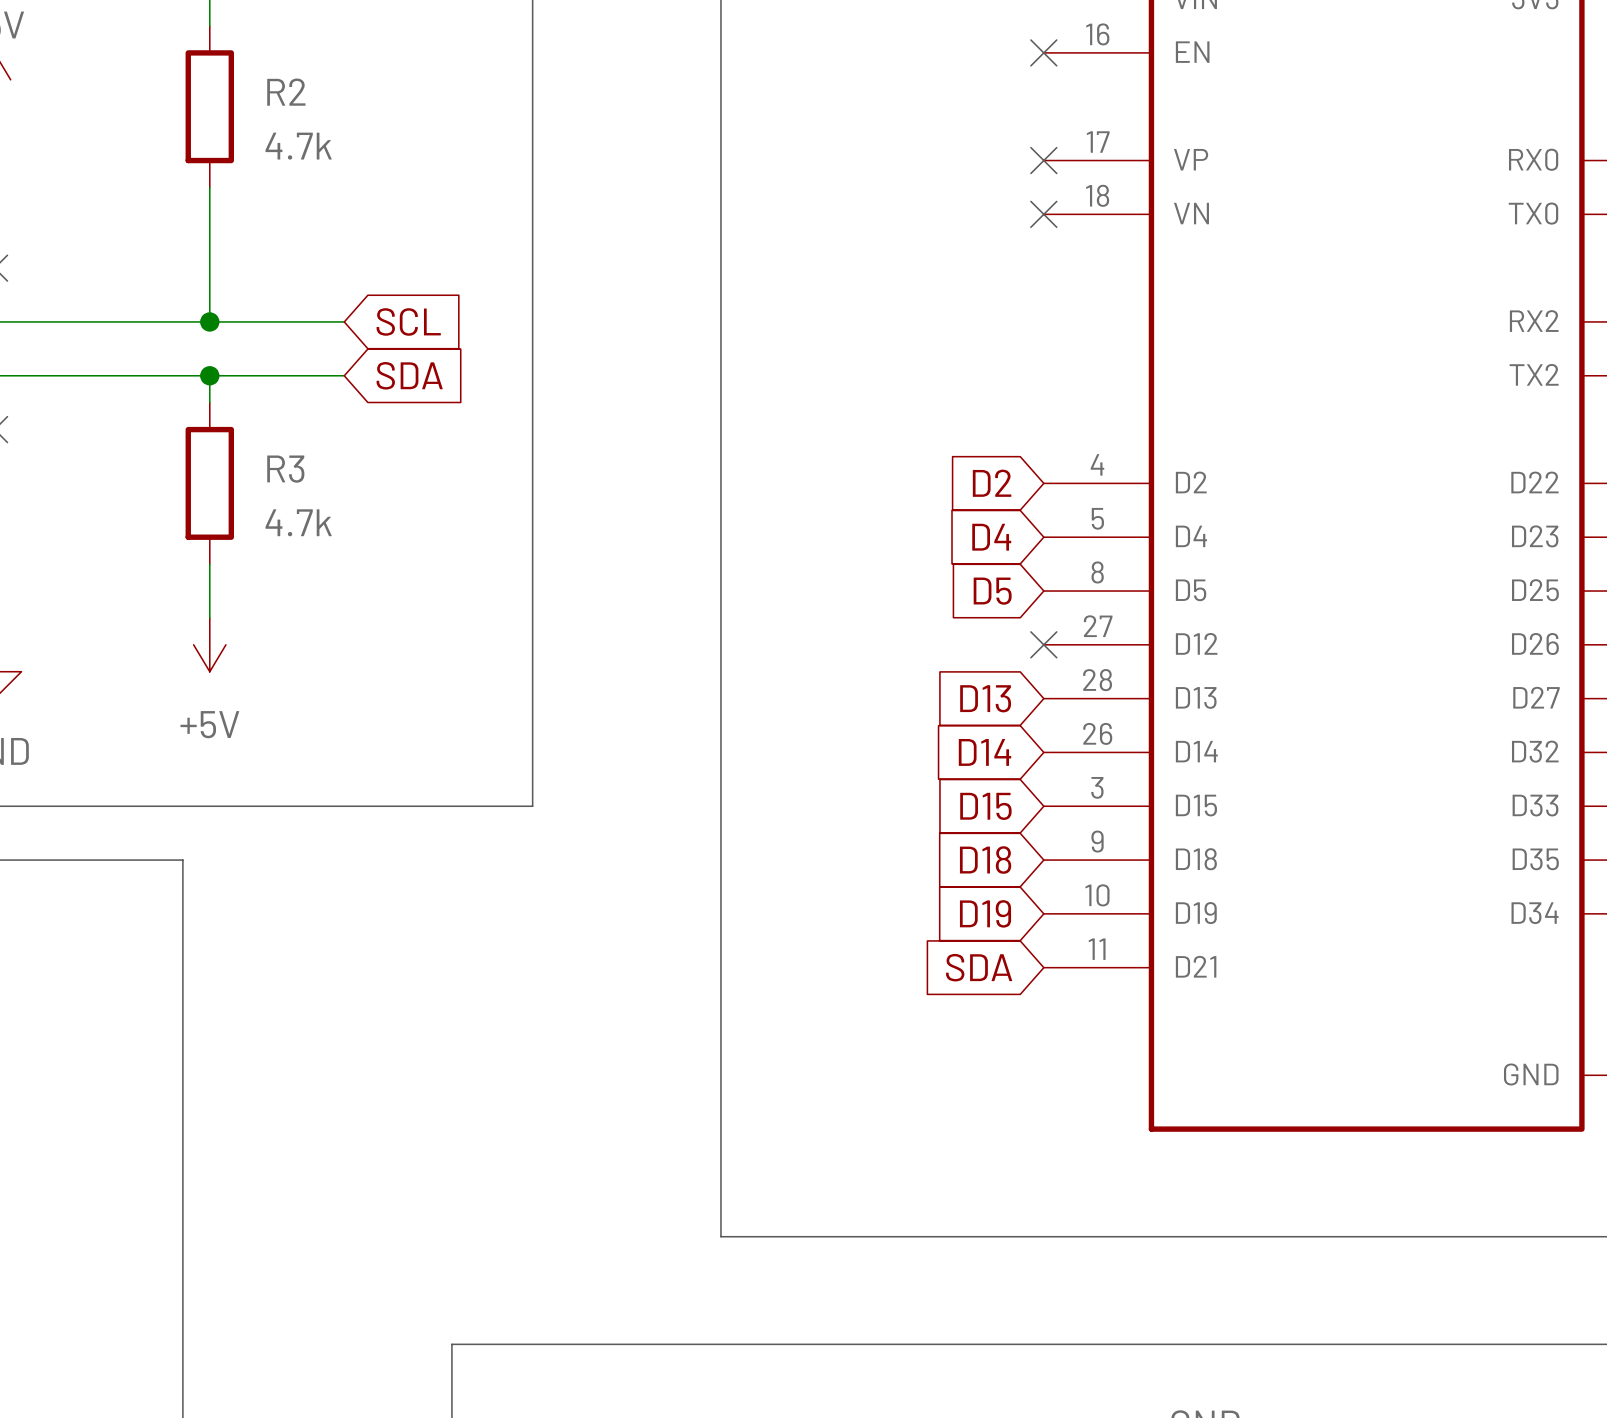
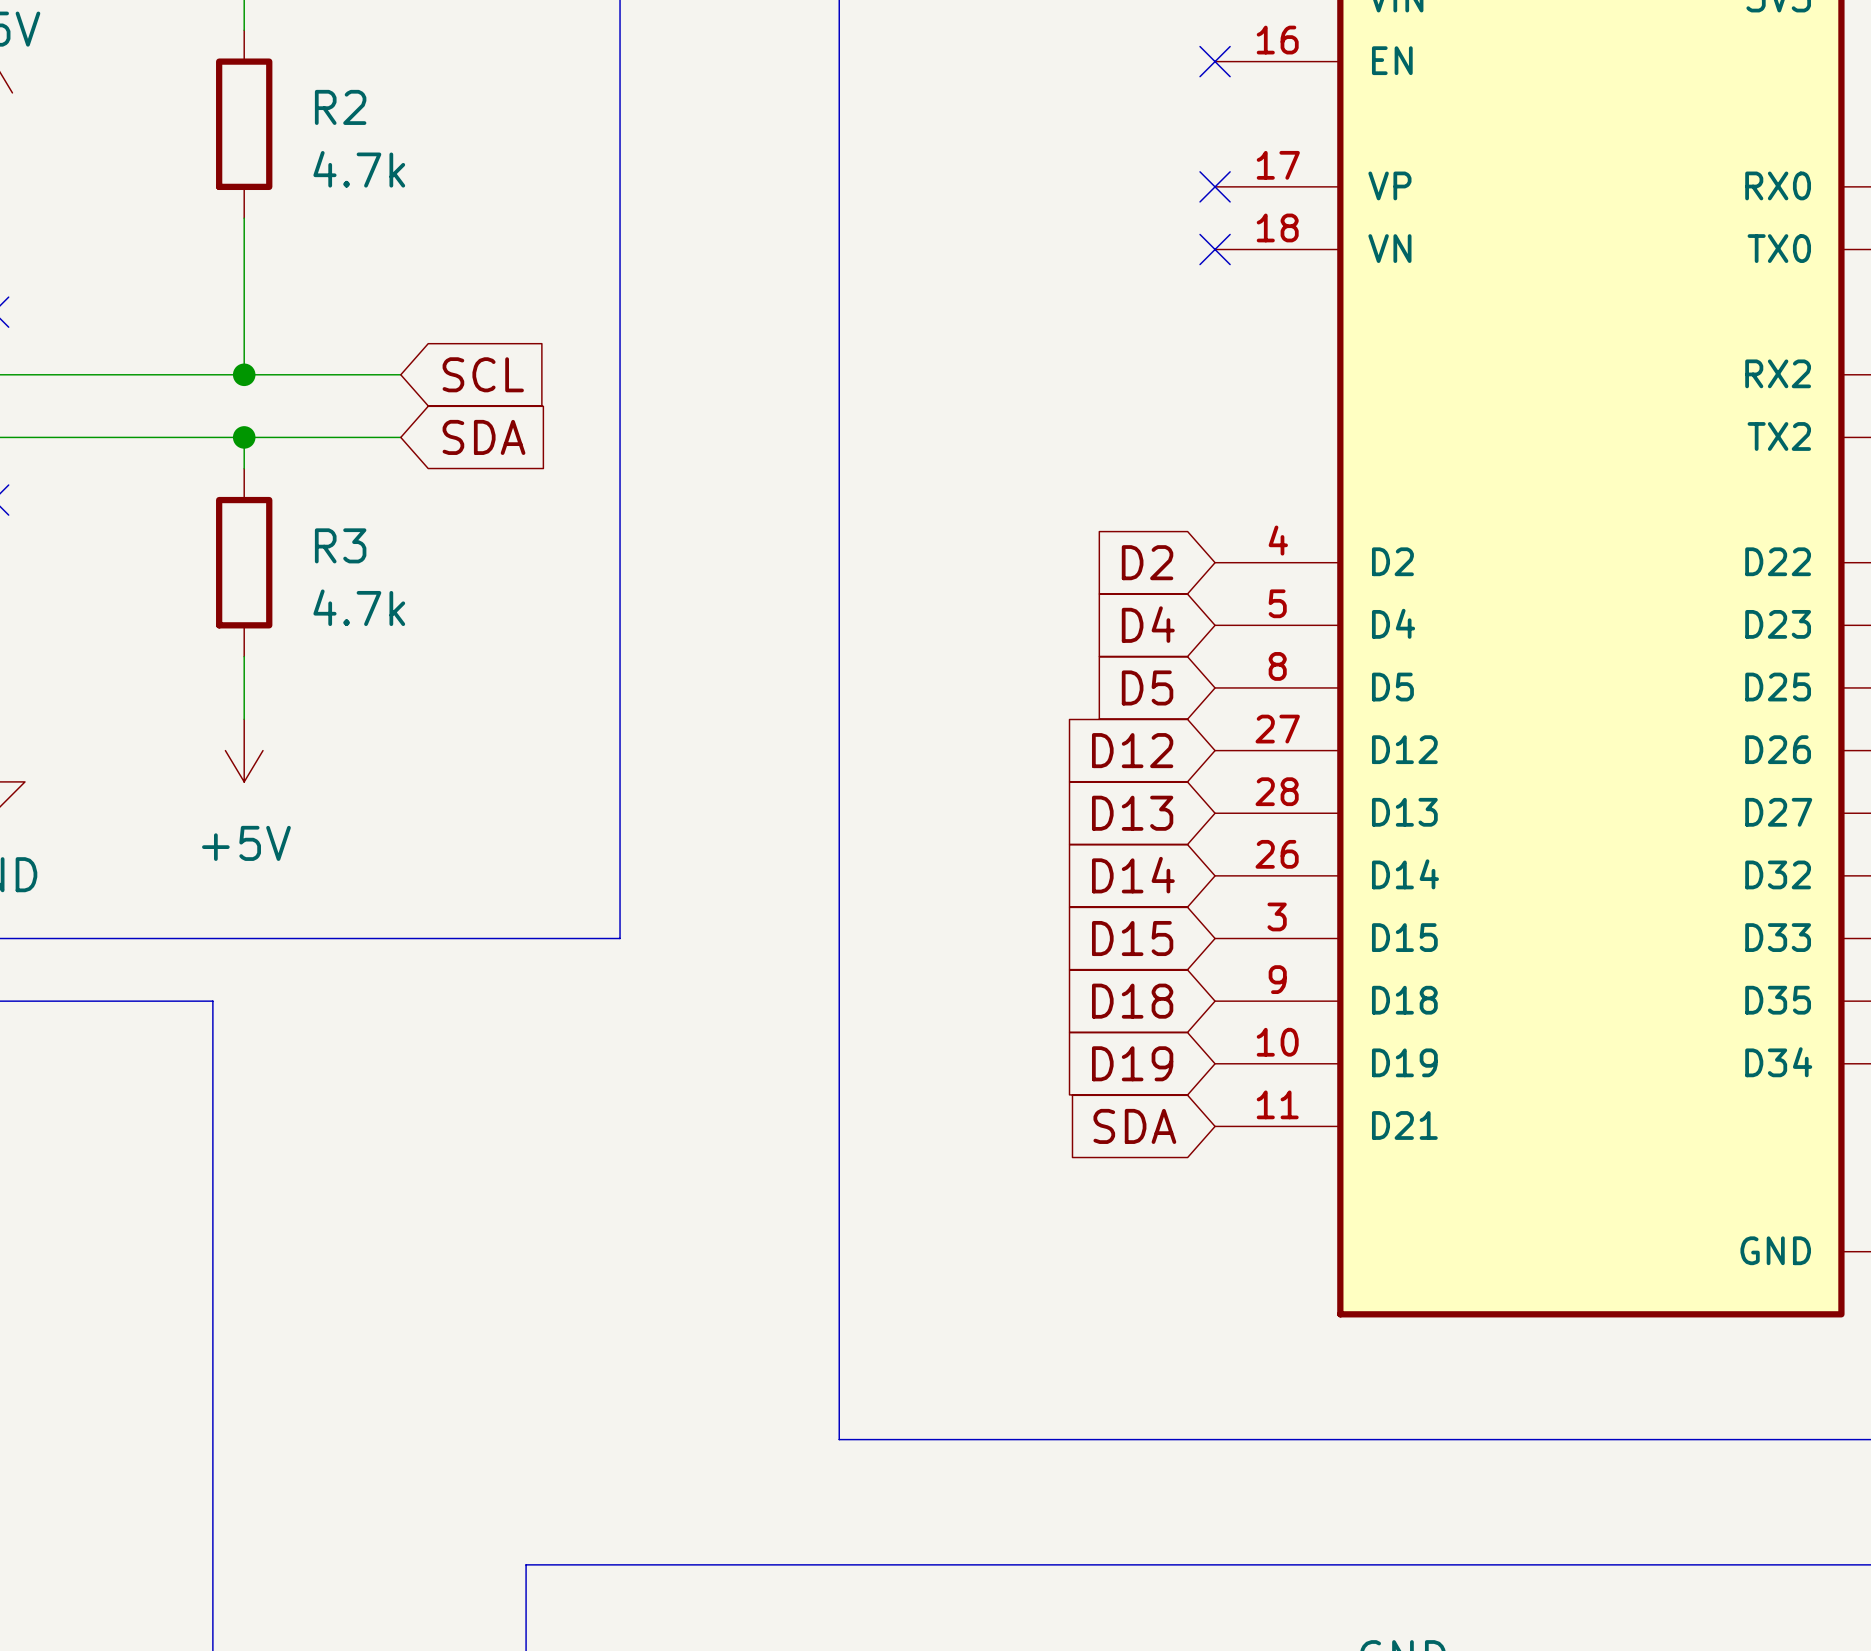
global label: none -> D12 (1132, 750)
no-connect mark: (1043, 644) -> none

